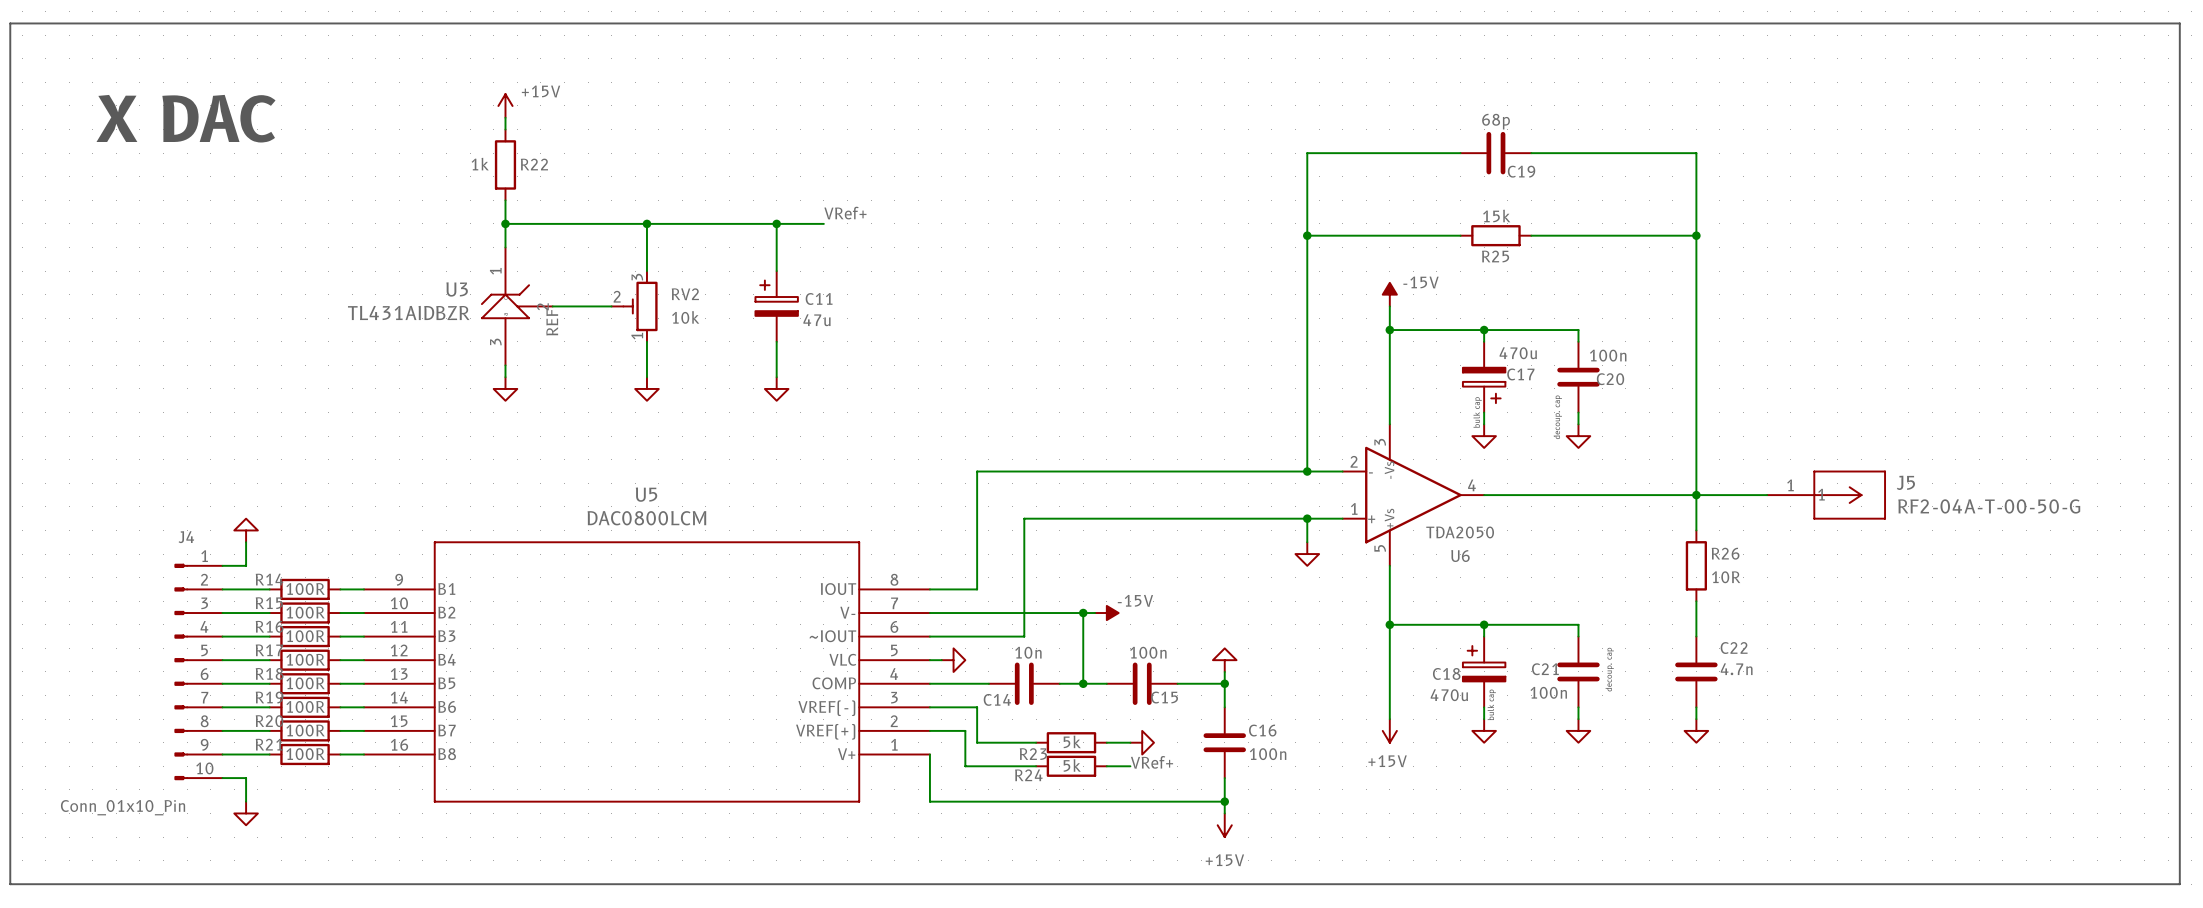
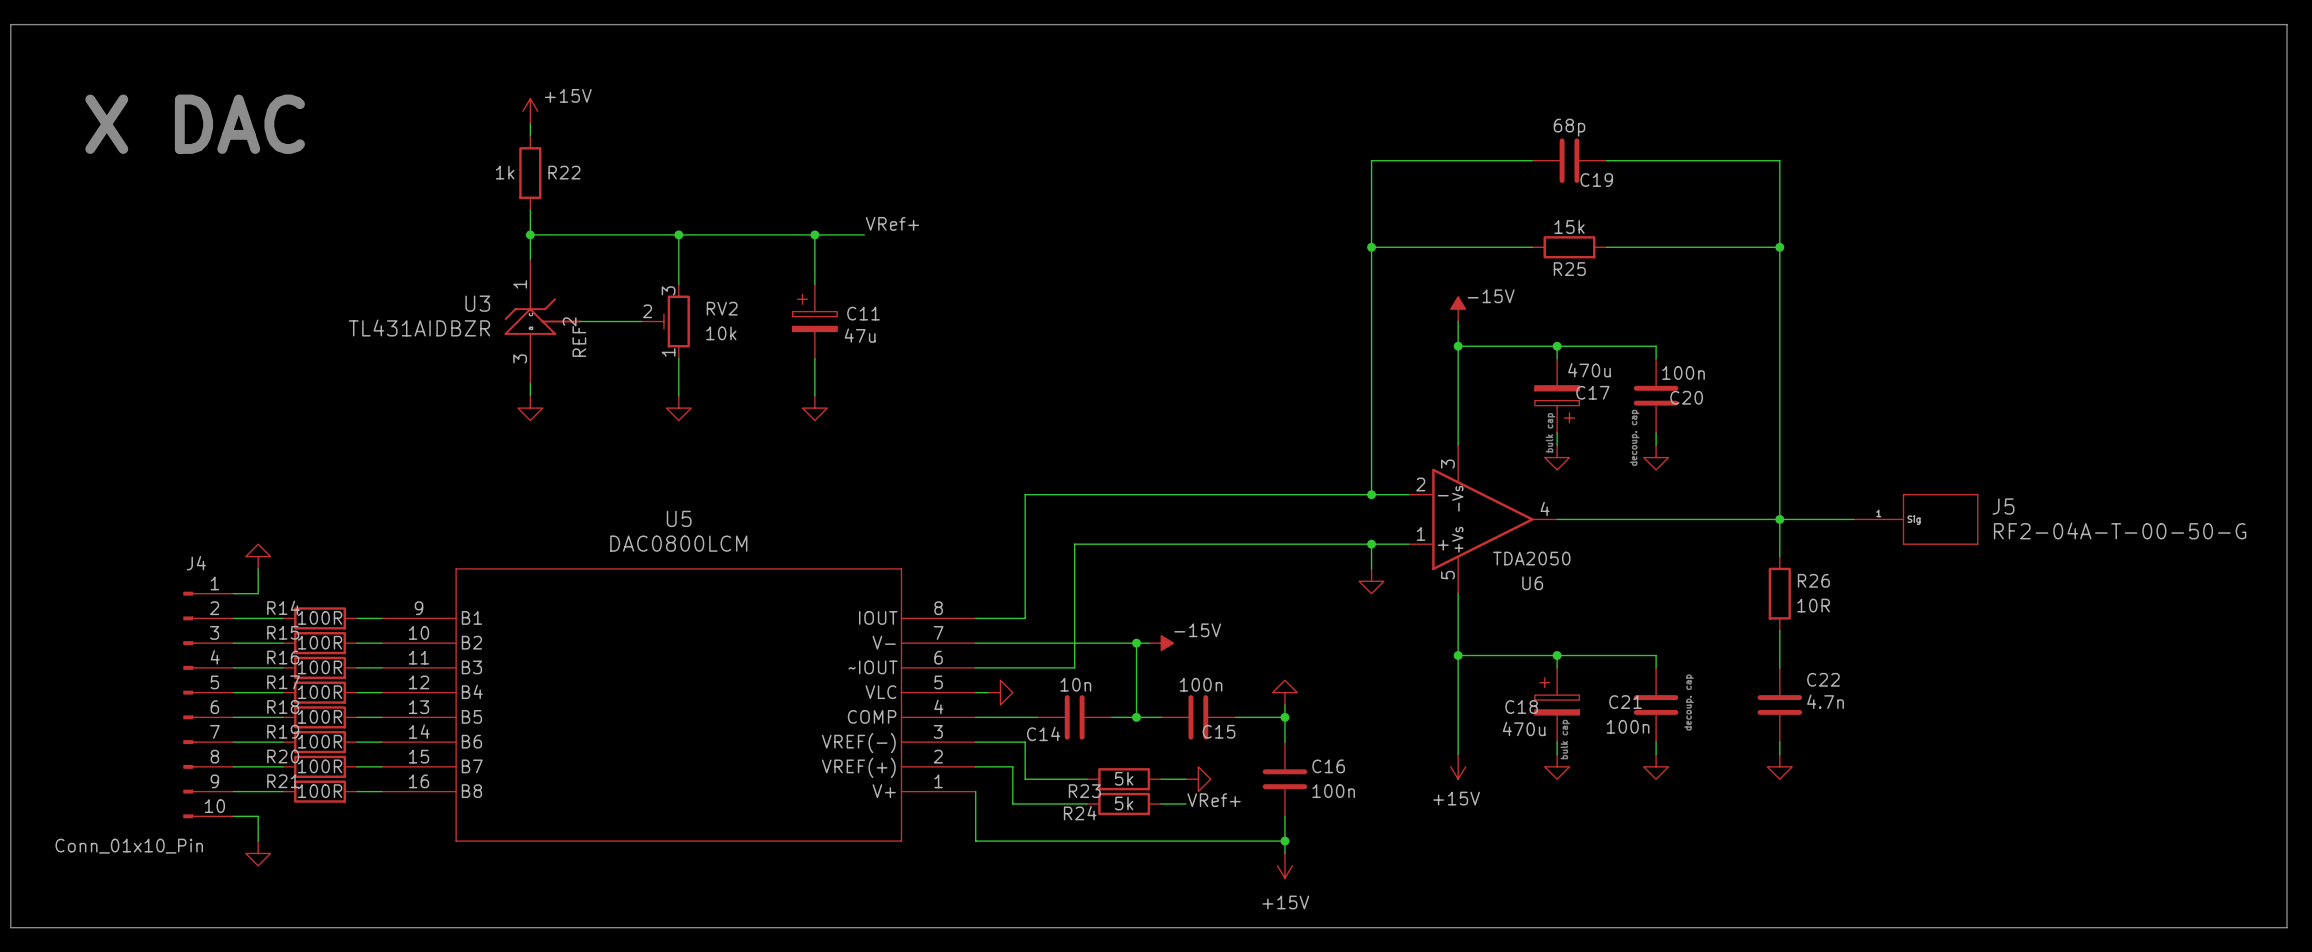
J5 symbol: [1767, 470, 1886, 520] -> [1854, 494, 1979, 545]

